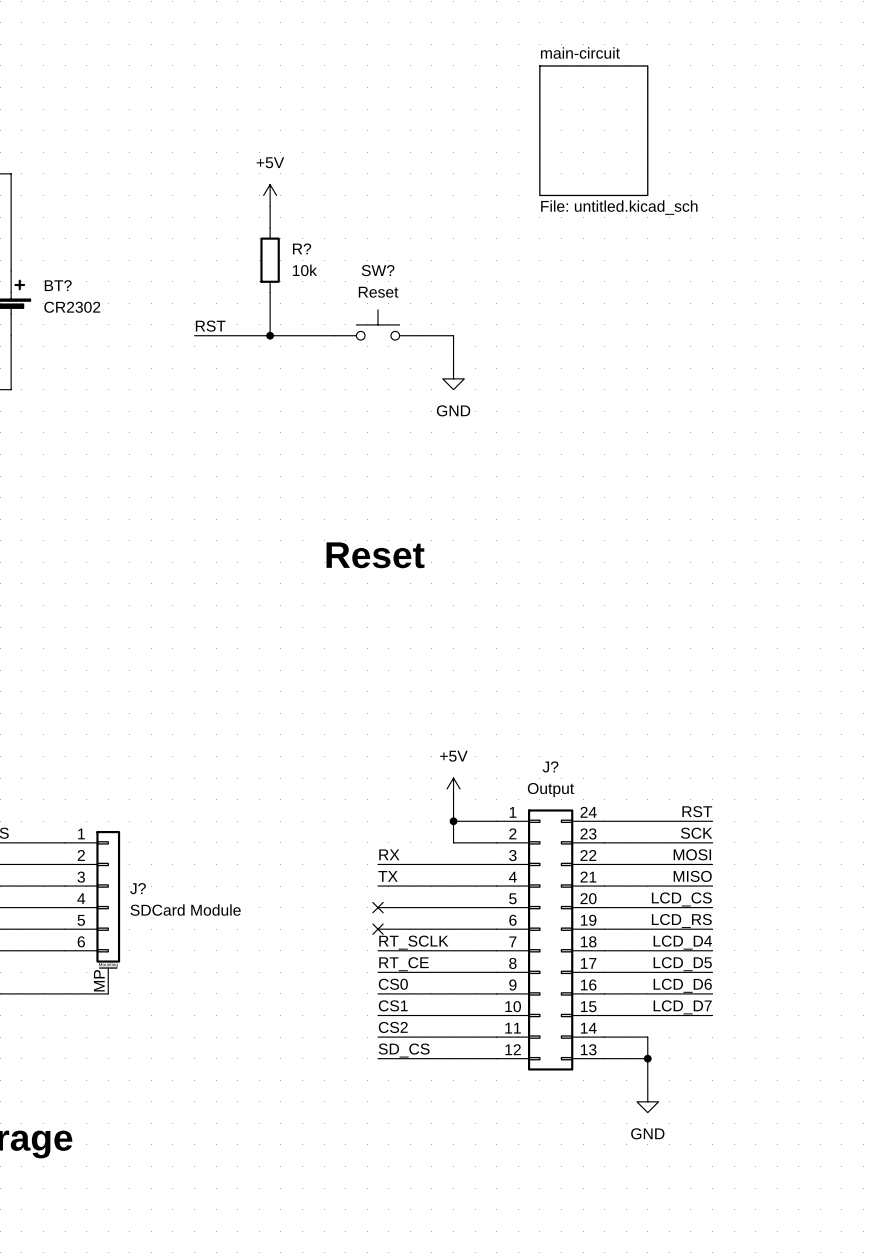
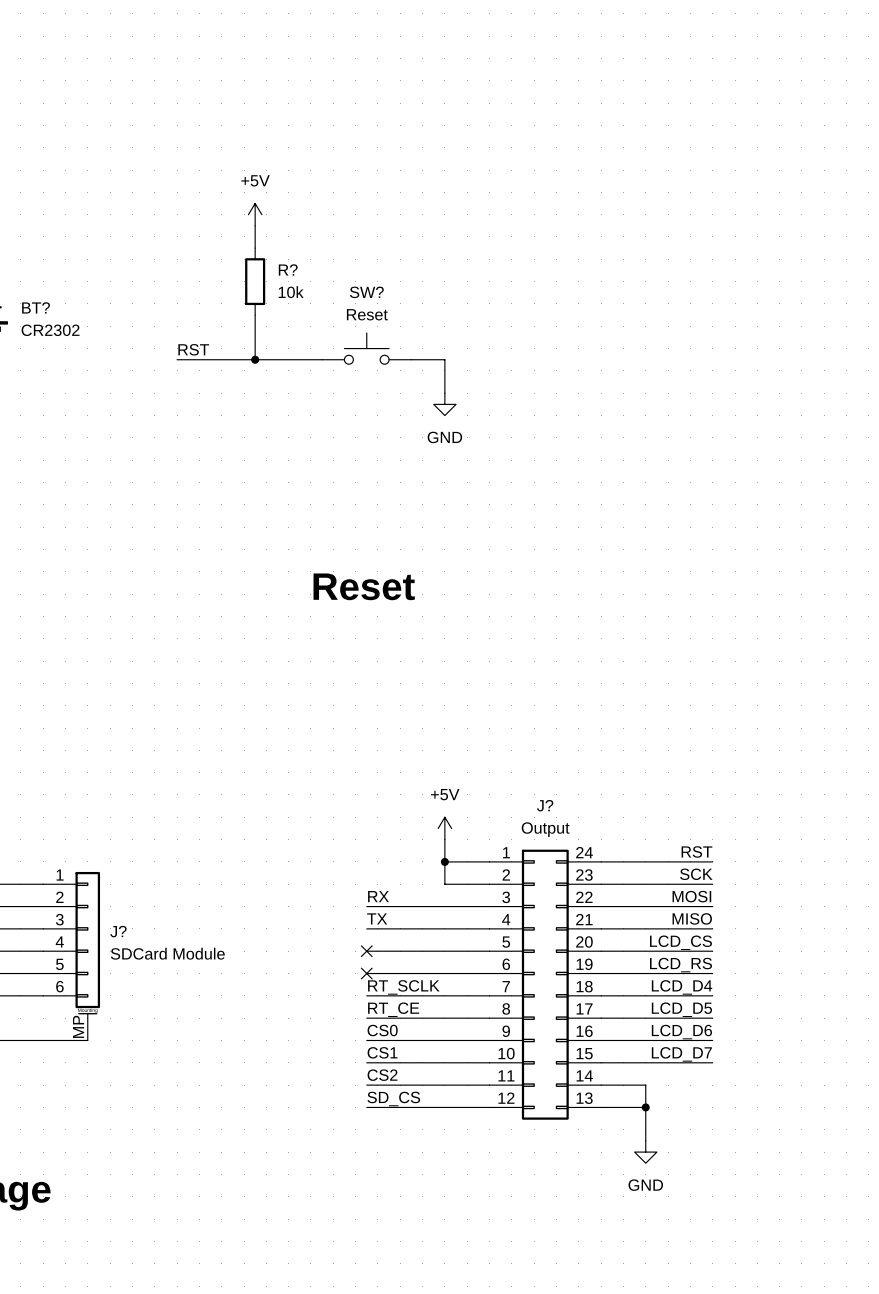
sheet main-circuit: File: untitled.kicad_sch (593, 130) -> none

